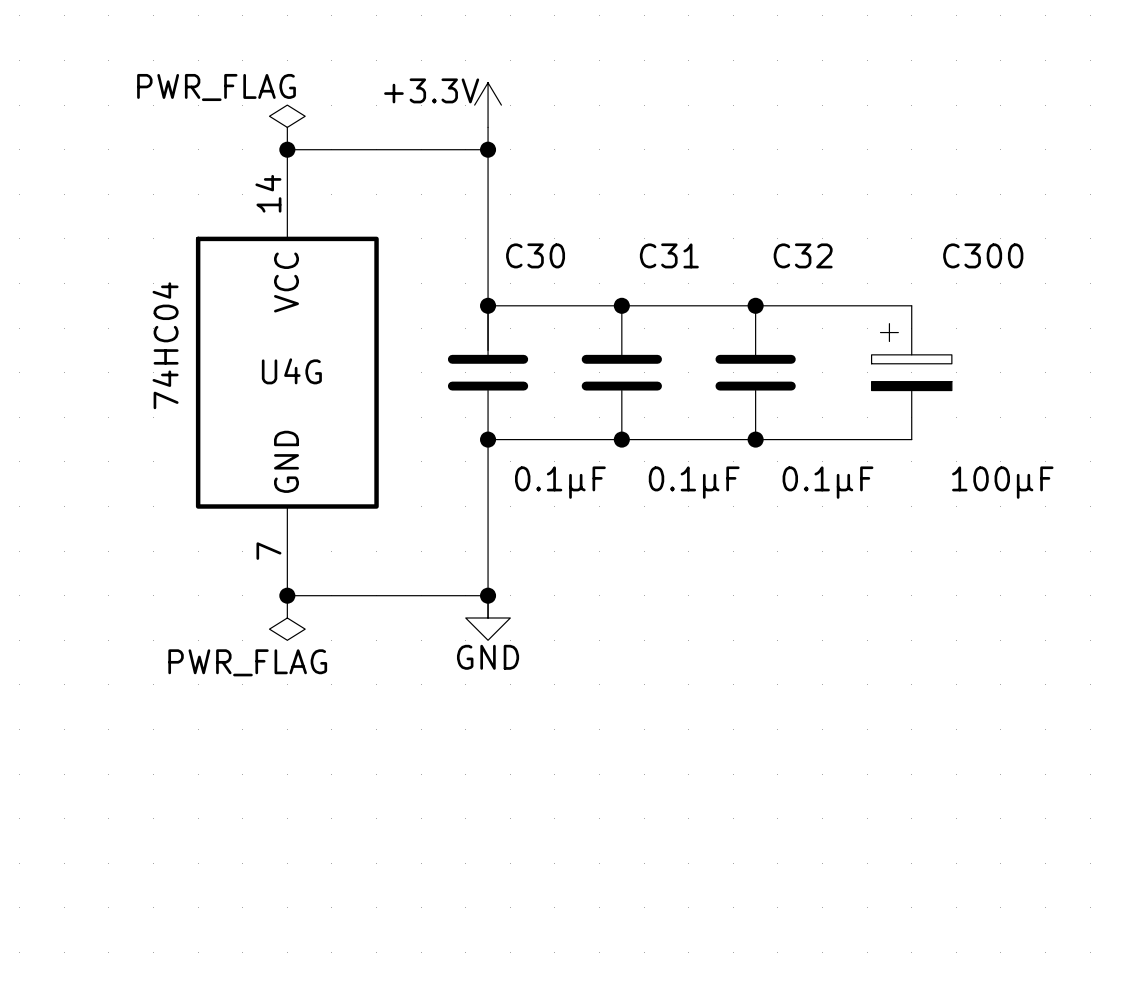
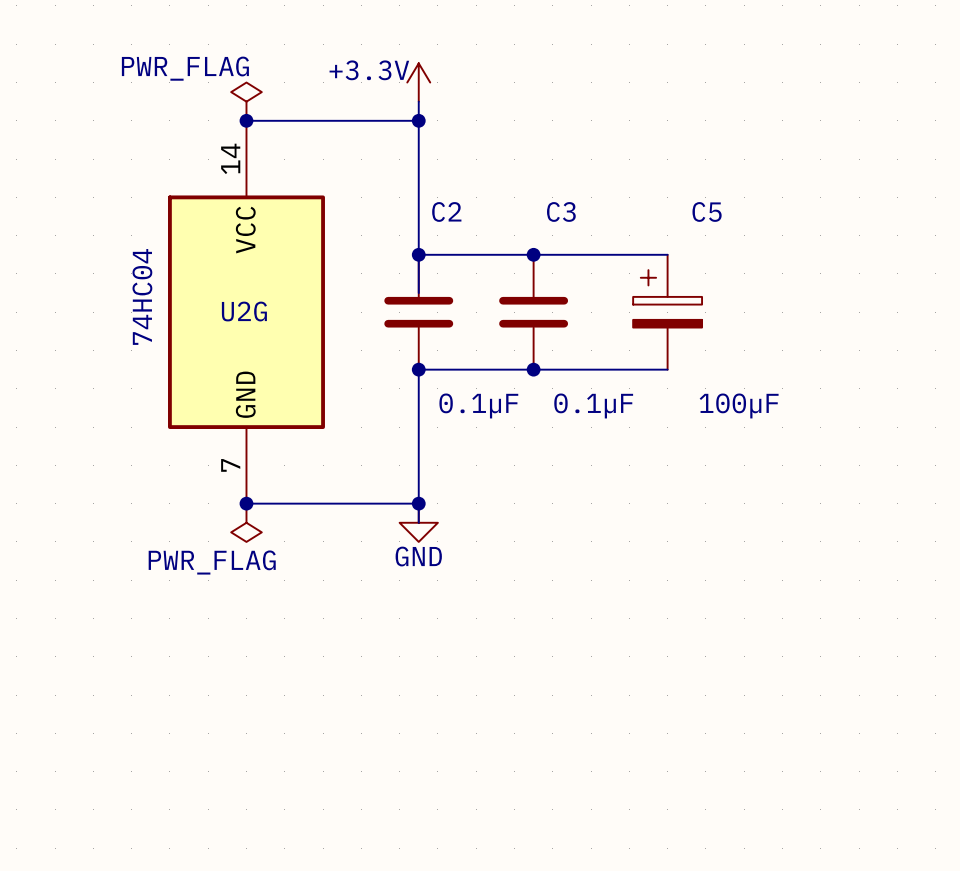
C30 name: C30 (535, 255) -> C2 (446, 211)
C31 name: C31 (669, 255) -> C3 (561, 211)
junction: (755, 305) -> none
wire: (777, 305) (911, 305) -> none
U4G name: U4G (291, 371) -> U2G (244, 311)
C32: 0.1µF (755, 372) -> none
C5: none -> 100µF (667, 312)
C300: 100µF (911, 372) -> none
junction: (755, 439) -> none
wire: (777, 439) (911, 439) -> none

